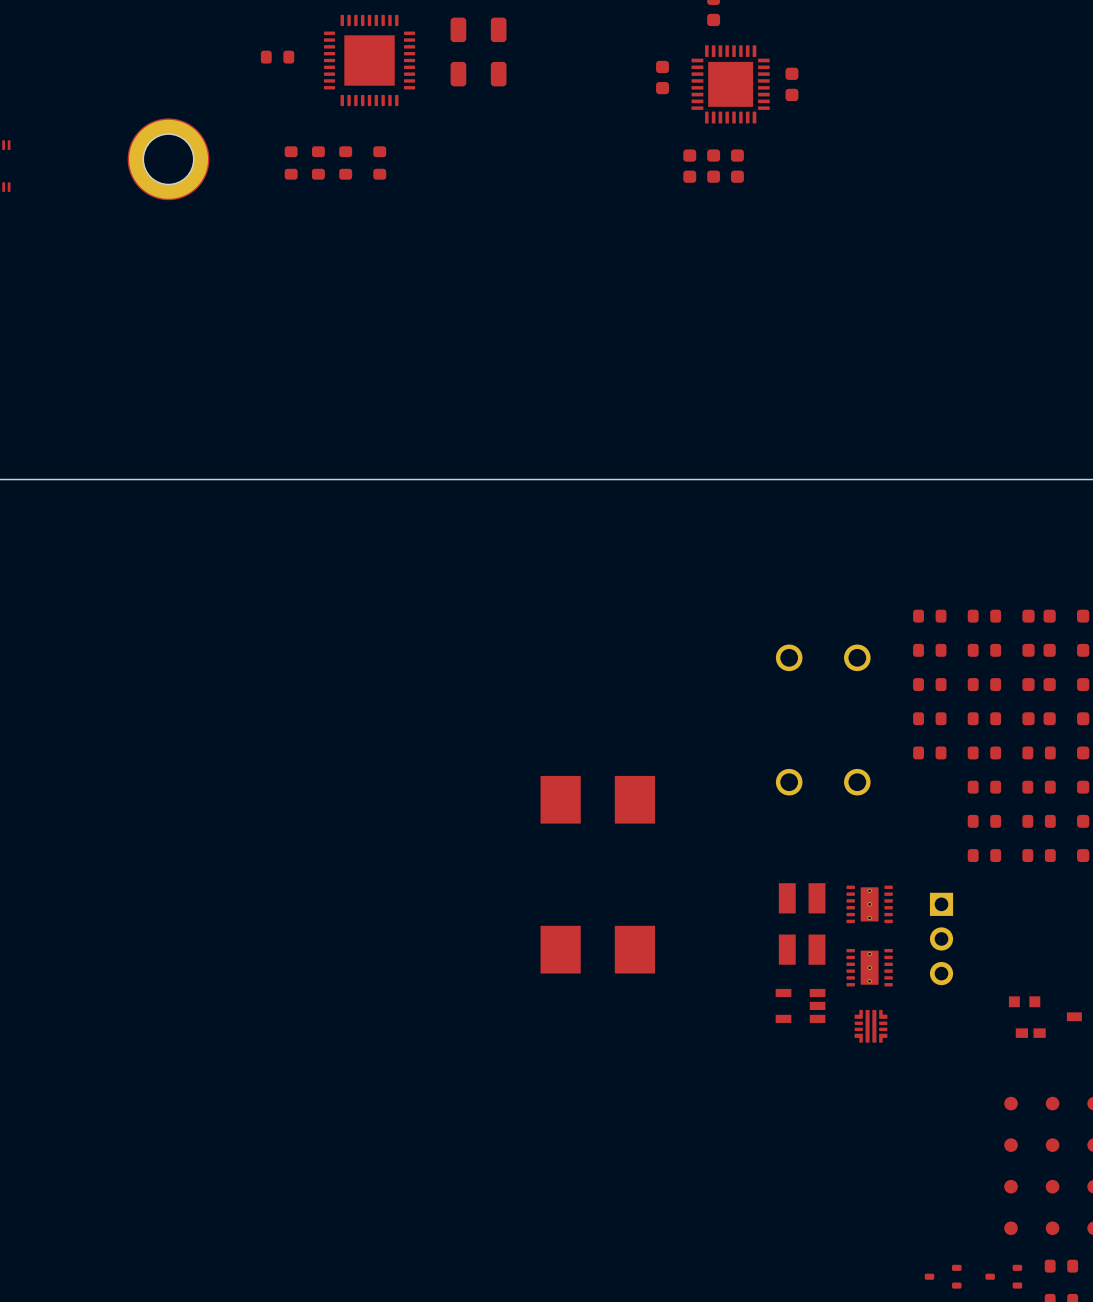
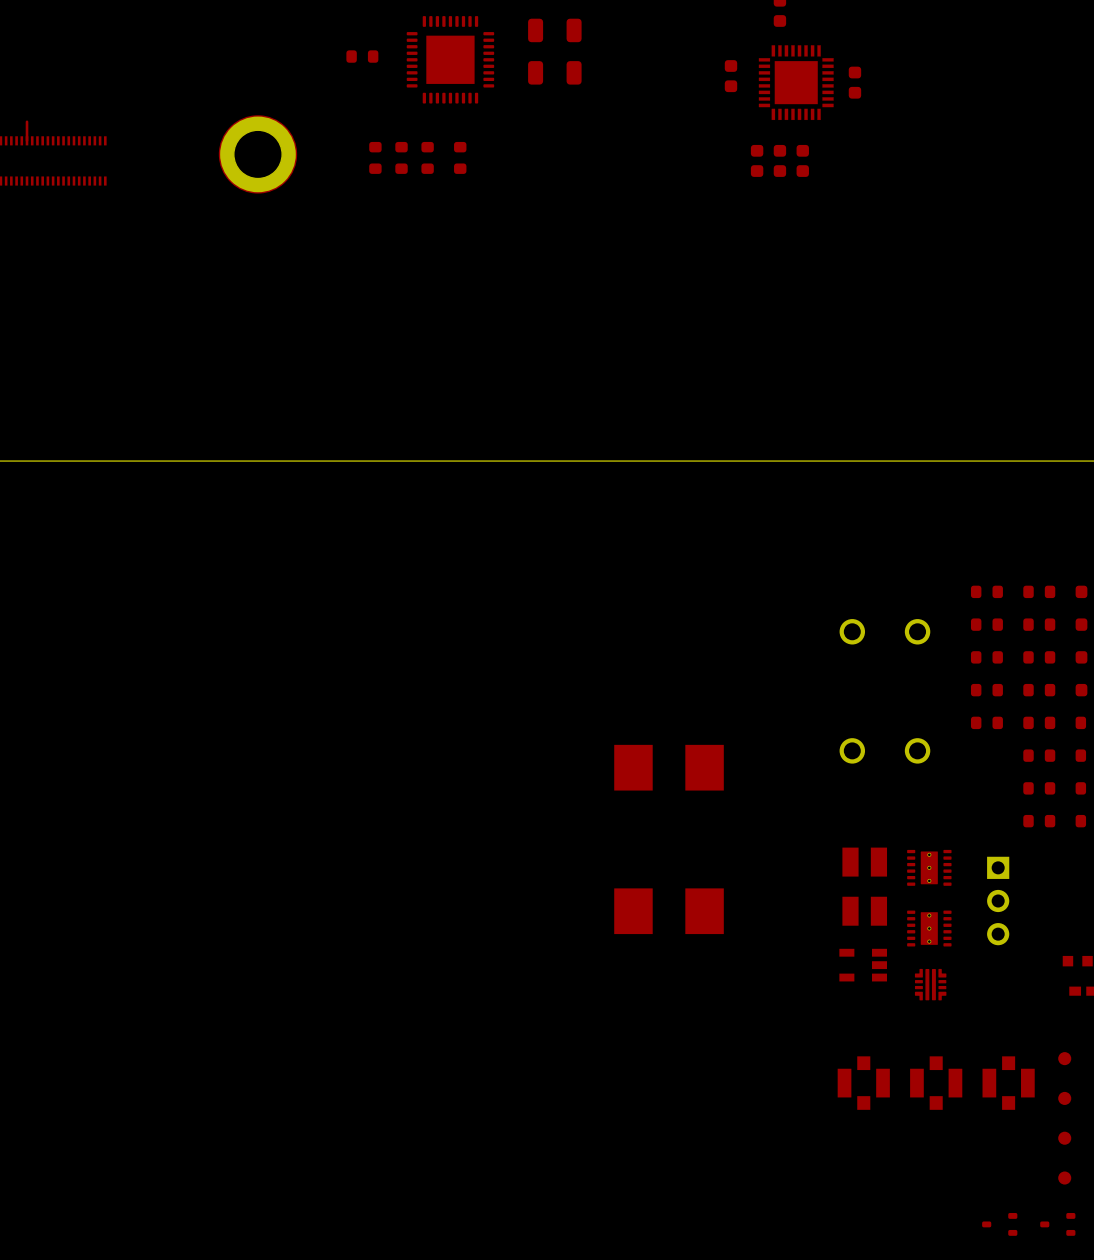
part: none -> (863, 1083)
part: none -> (936, 1083)
part: none -> (1008, 1083)

